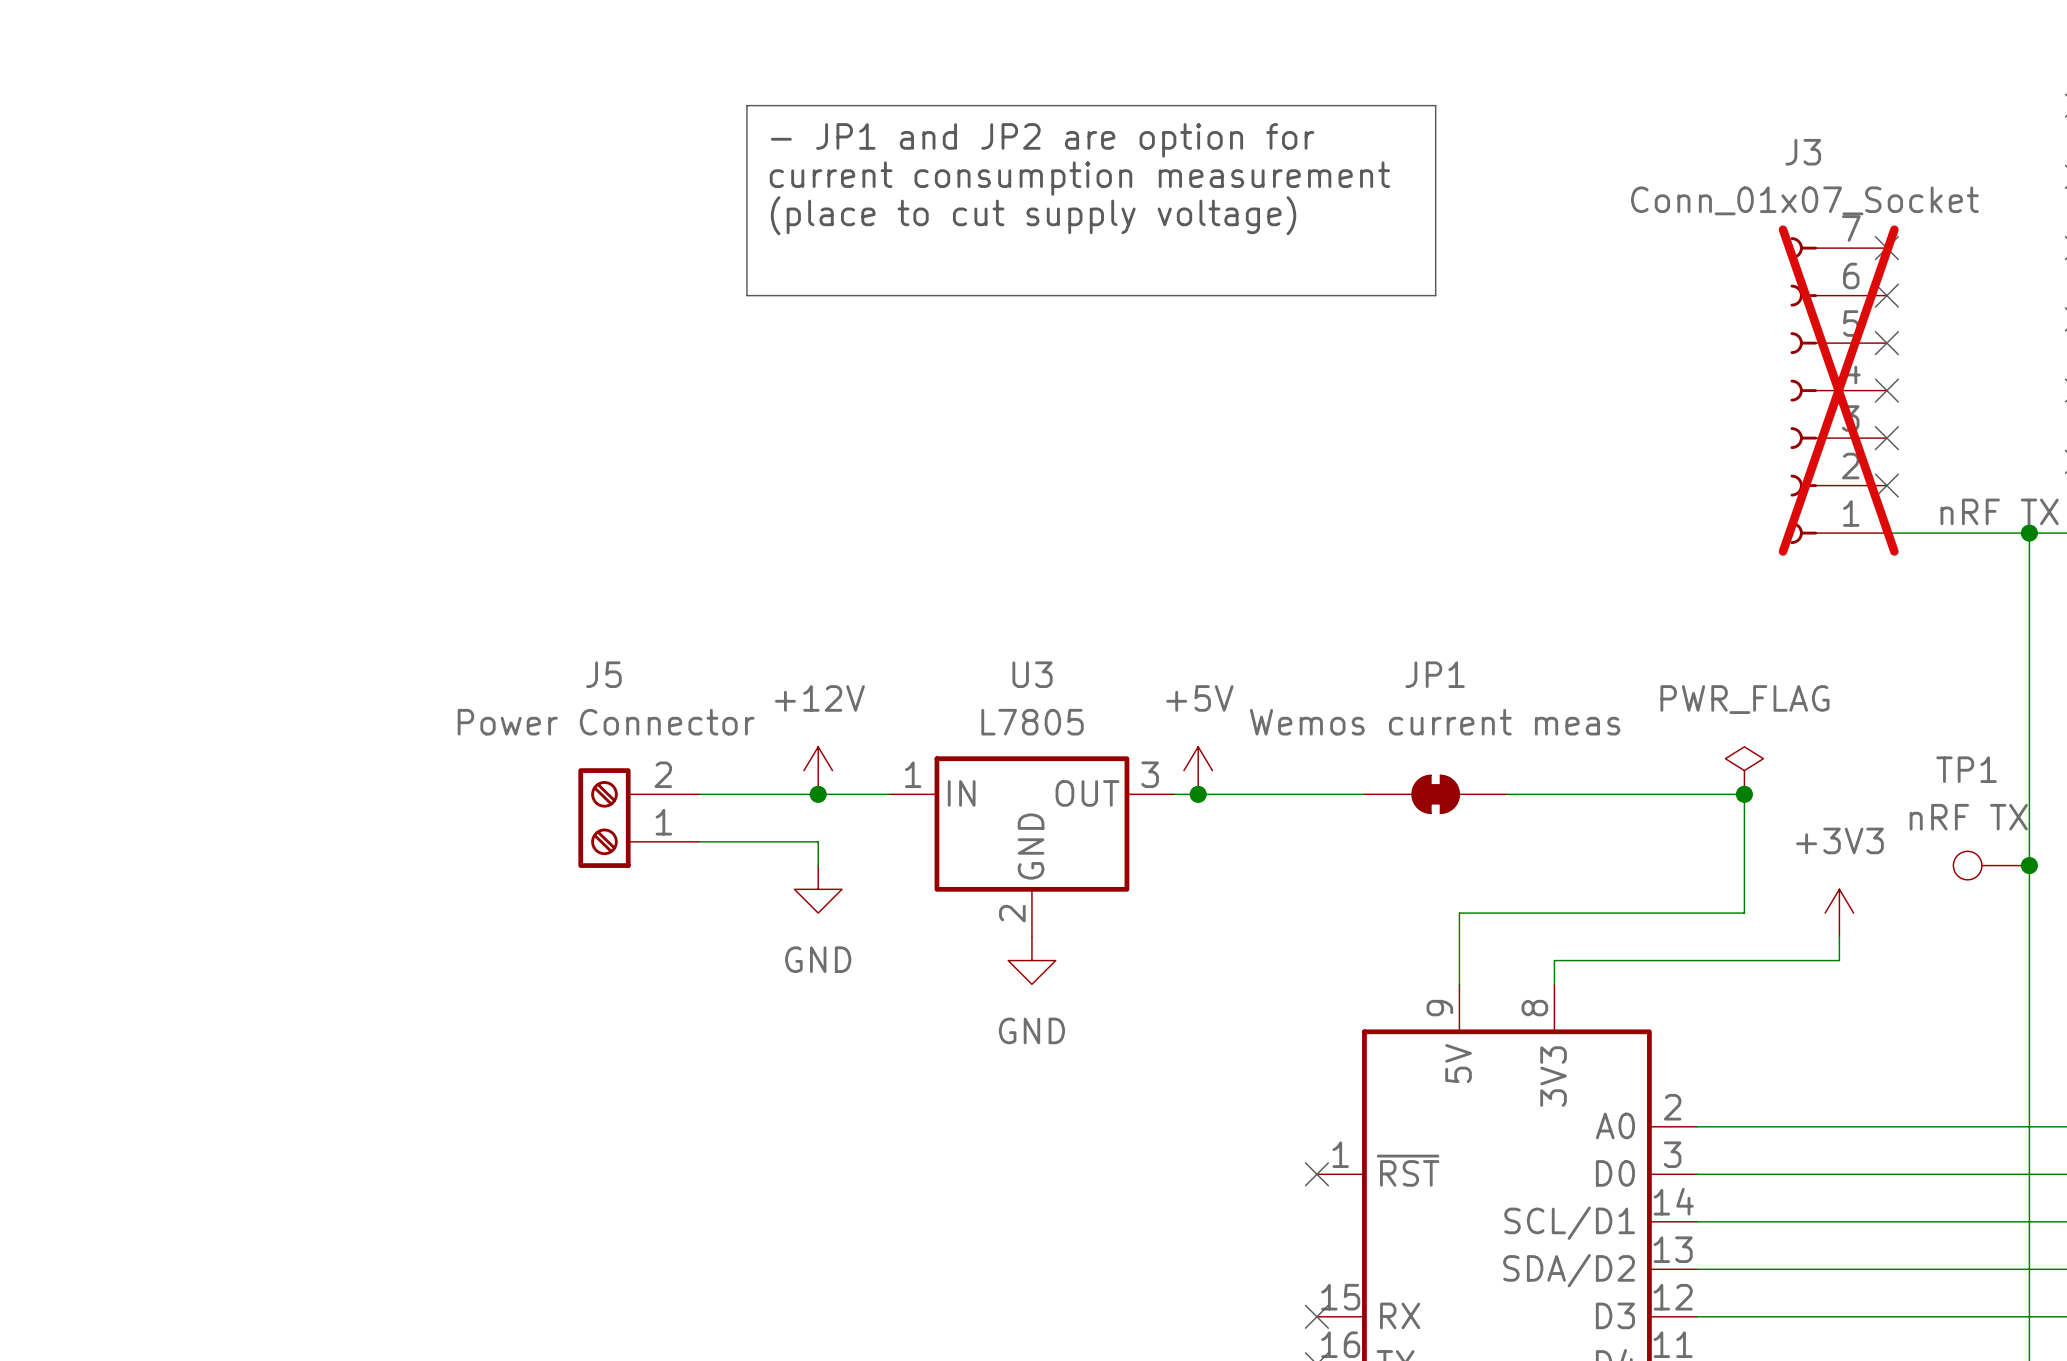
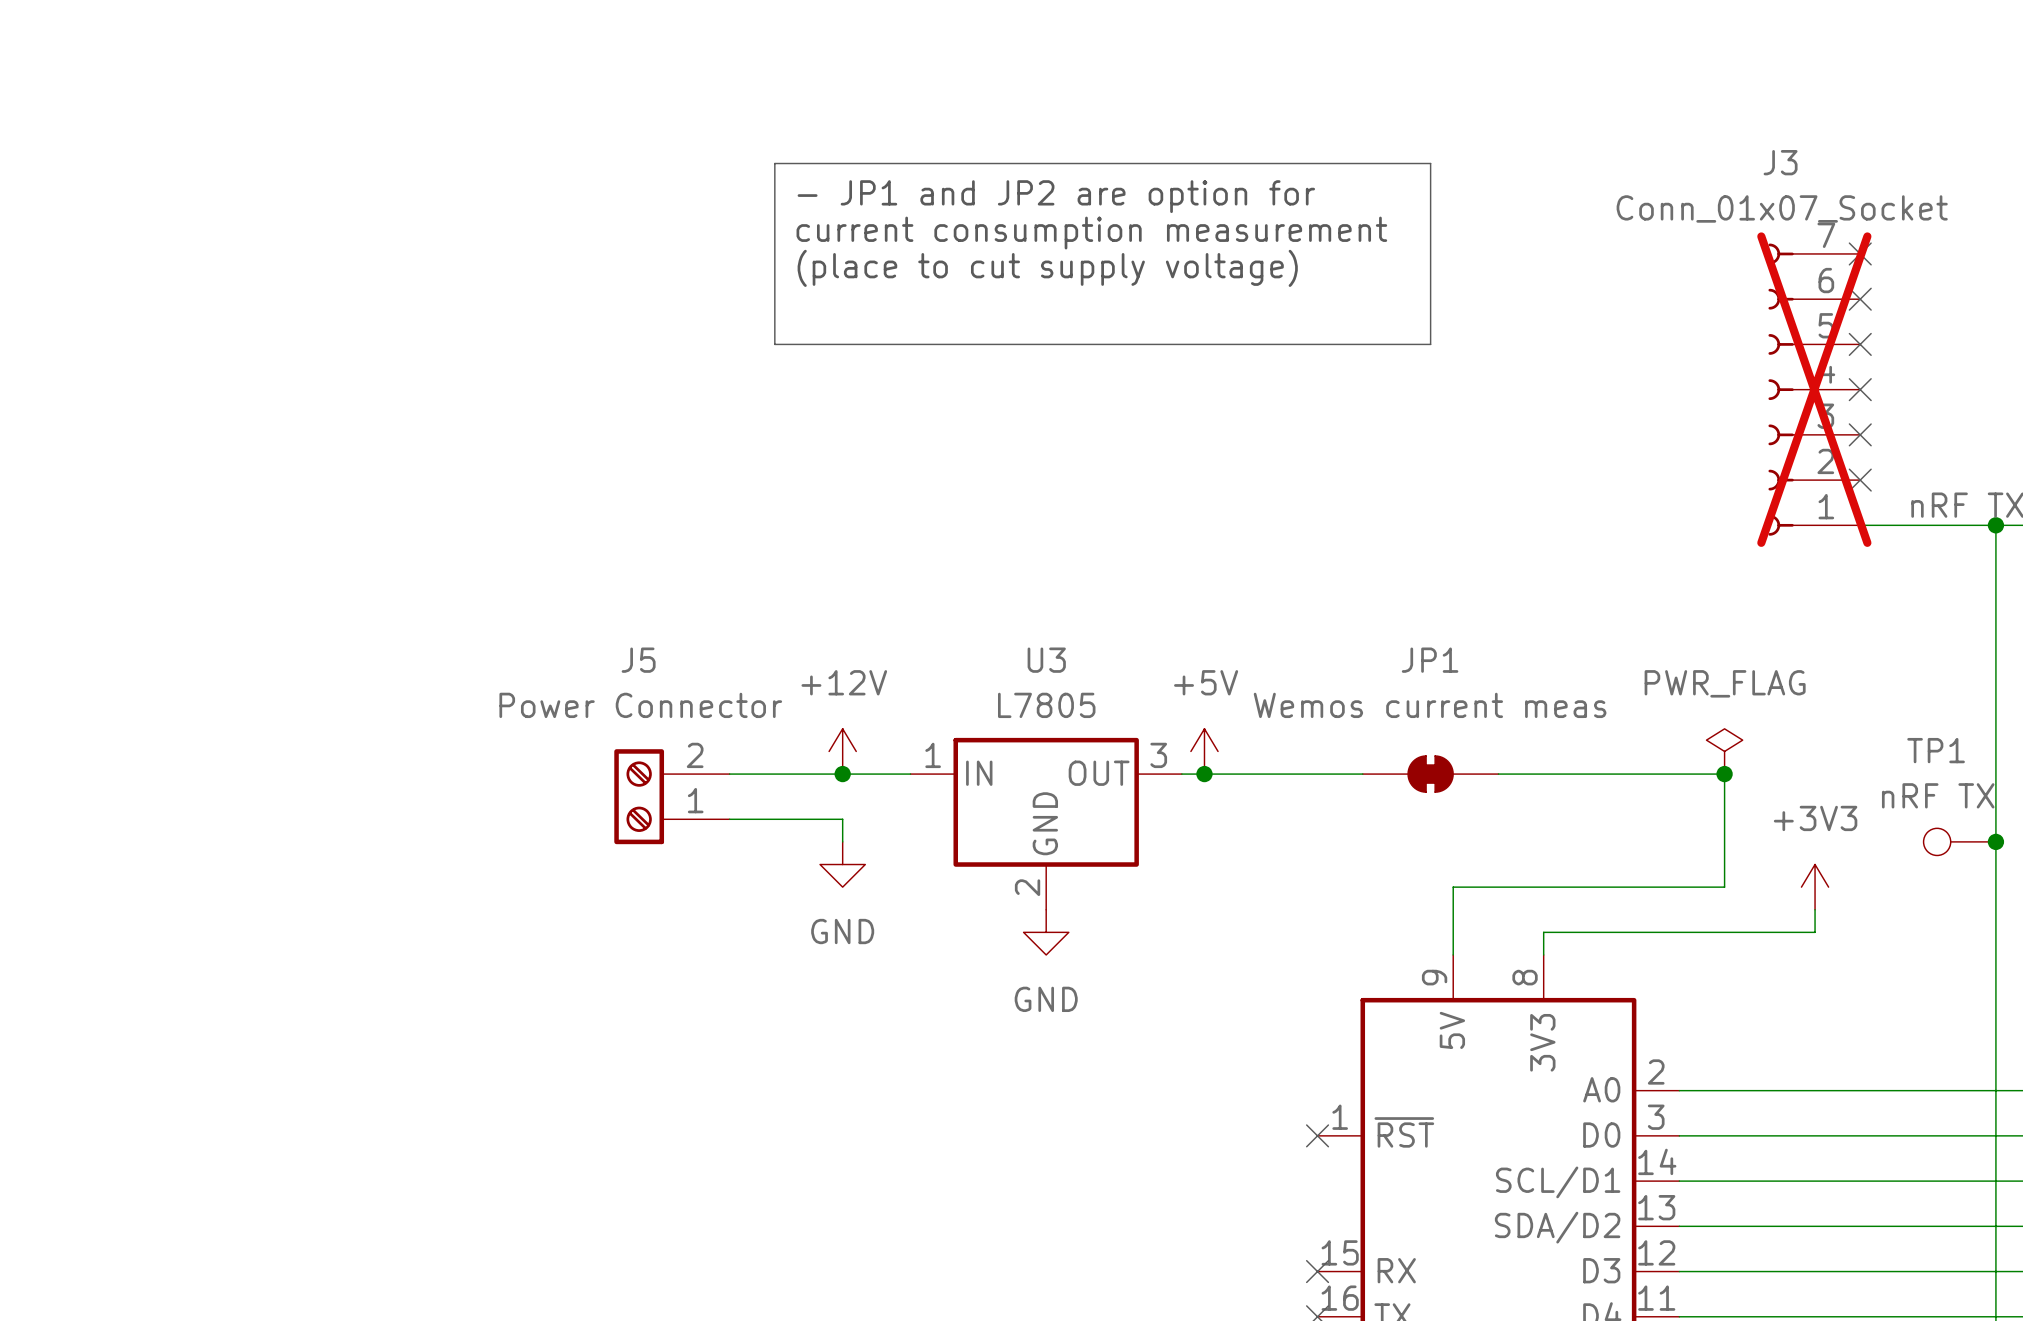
text position: - JP1 and JP2 are option for (1042, 140) -> - JP1 and JP2 are option for (1056, 196)
line: (746, 153) (746, 105) (1435, 105) (1435, 153) -> (774, 163) (1430, 163)
text position: current consumption measurement (1079, 178) -> current consumption measurement (1091, 233)
text position: (place to cut supply voltage) (1033, 215) -> (place to cut supply voltage) (1047, 268)
line: (746, 295) (1435, 295) -> (774, 299) (774, 344) (1430, 344) (1430, 299)

